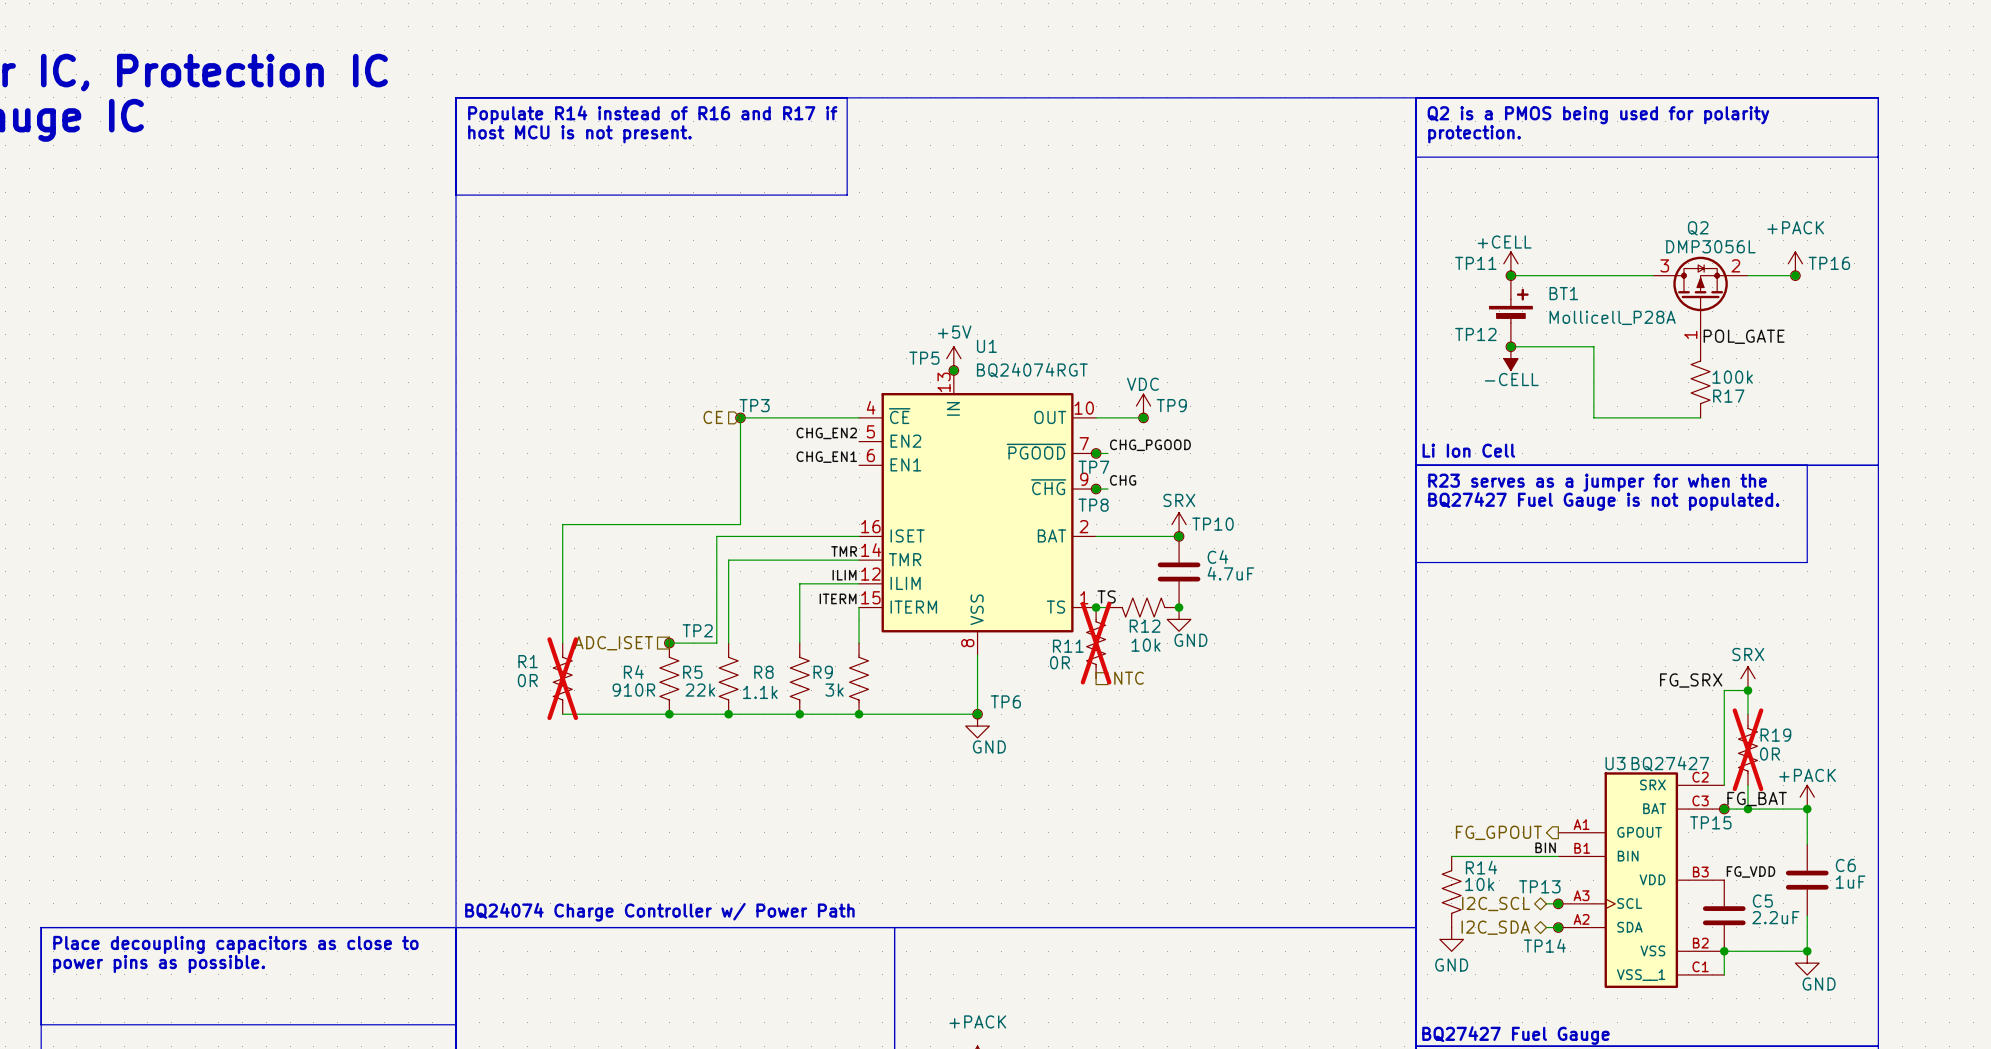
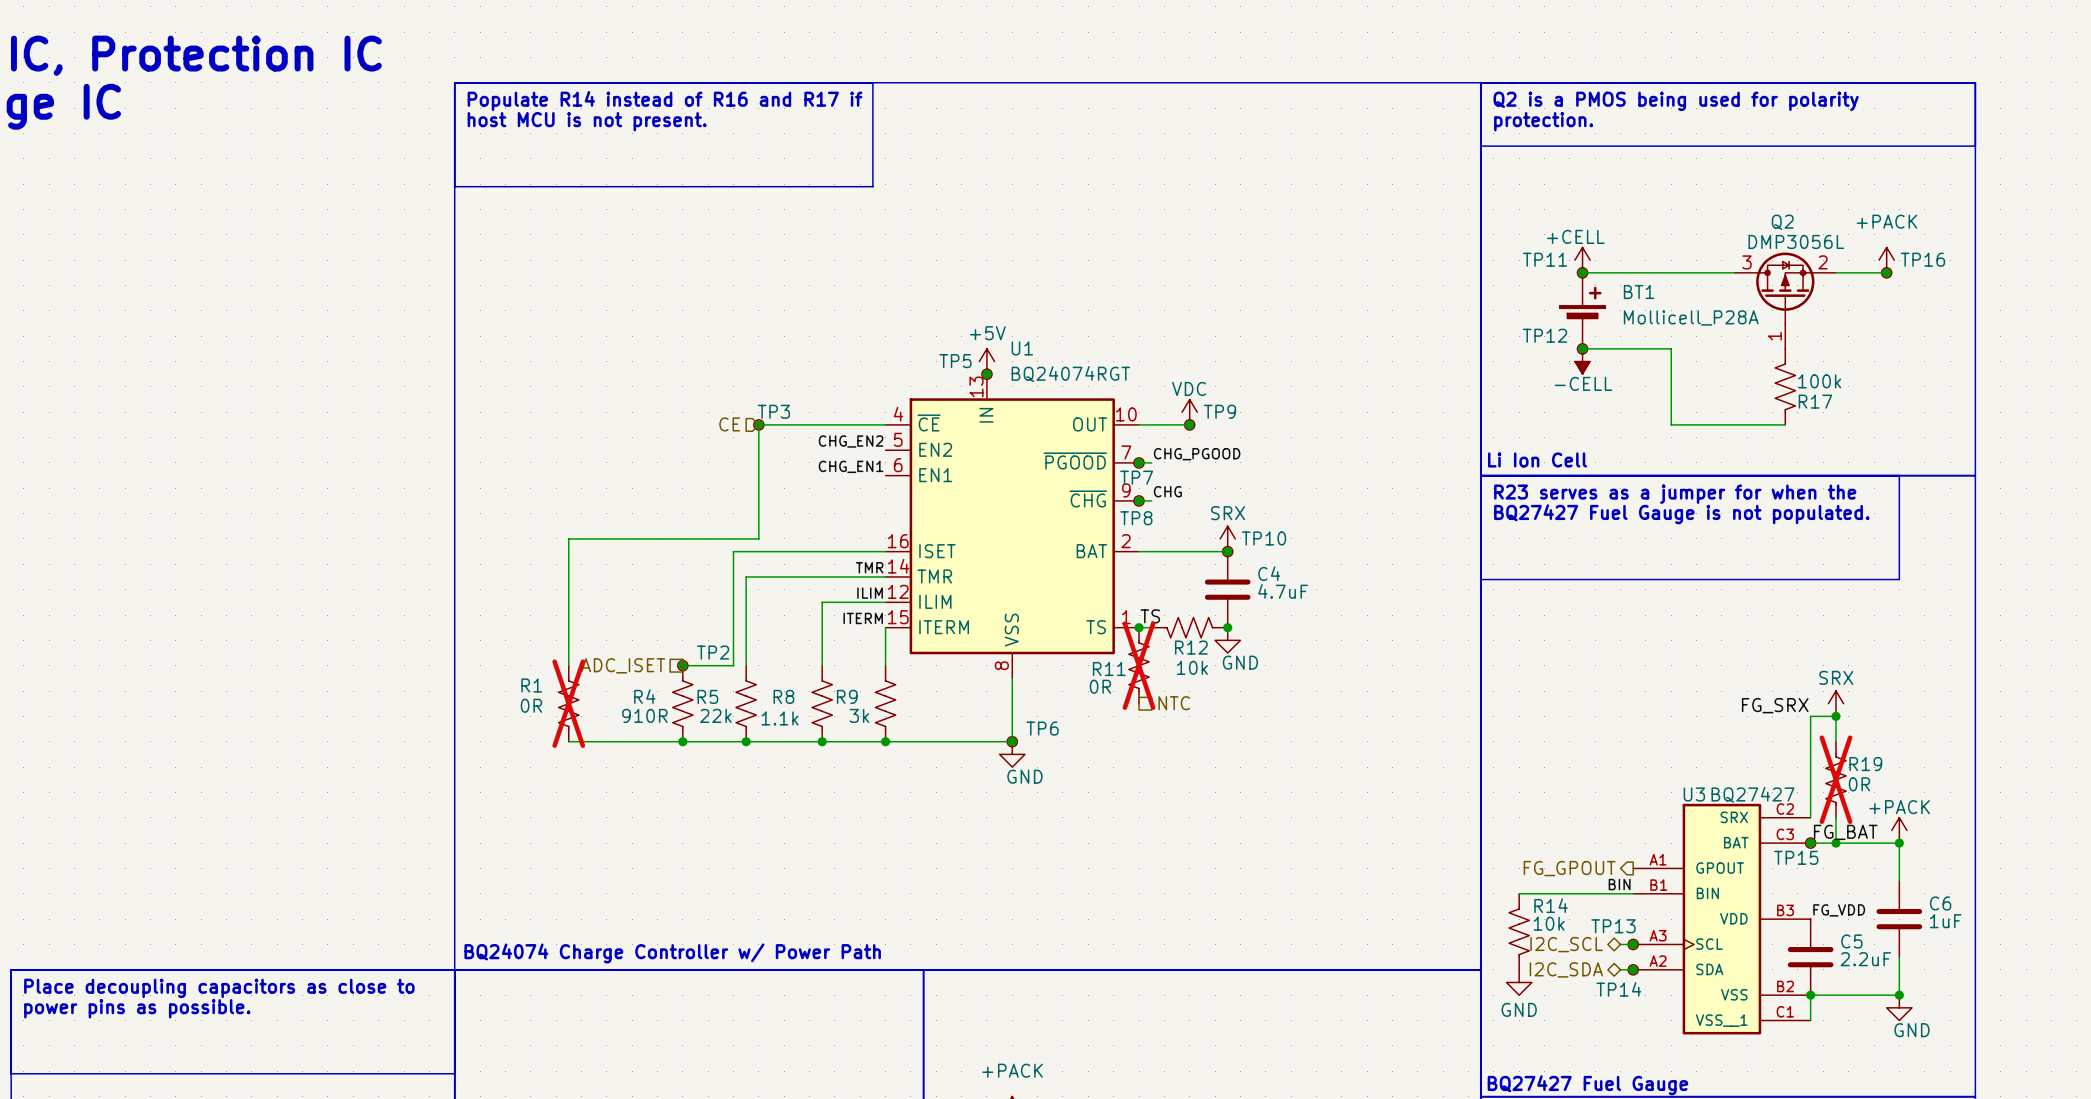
label: POL_GATE (1744, 336) -> none

